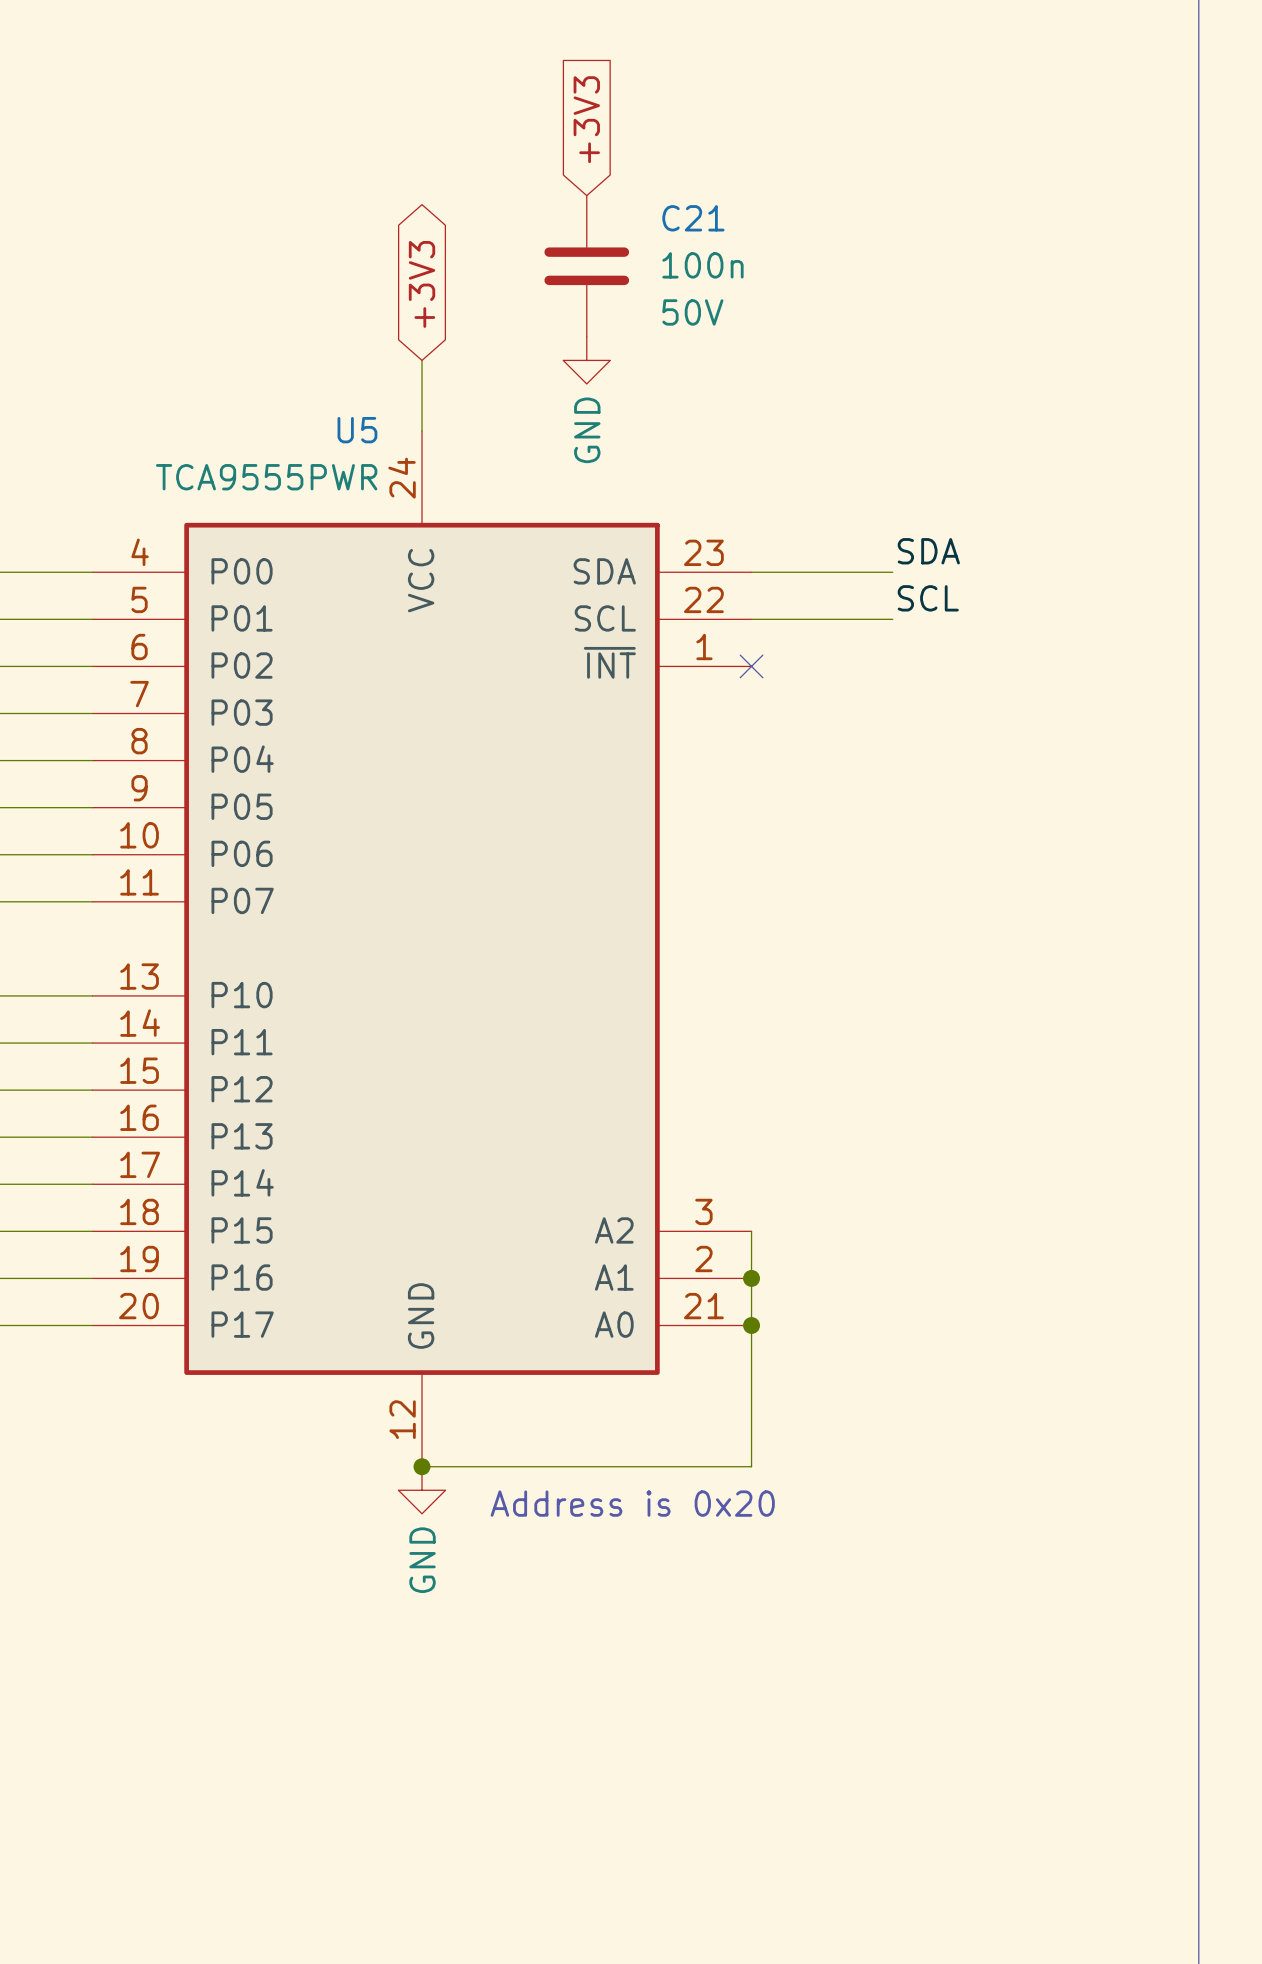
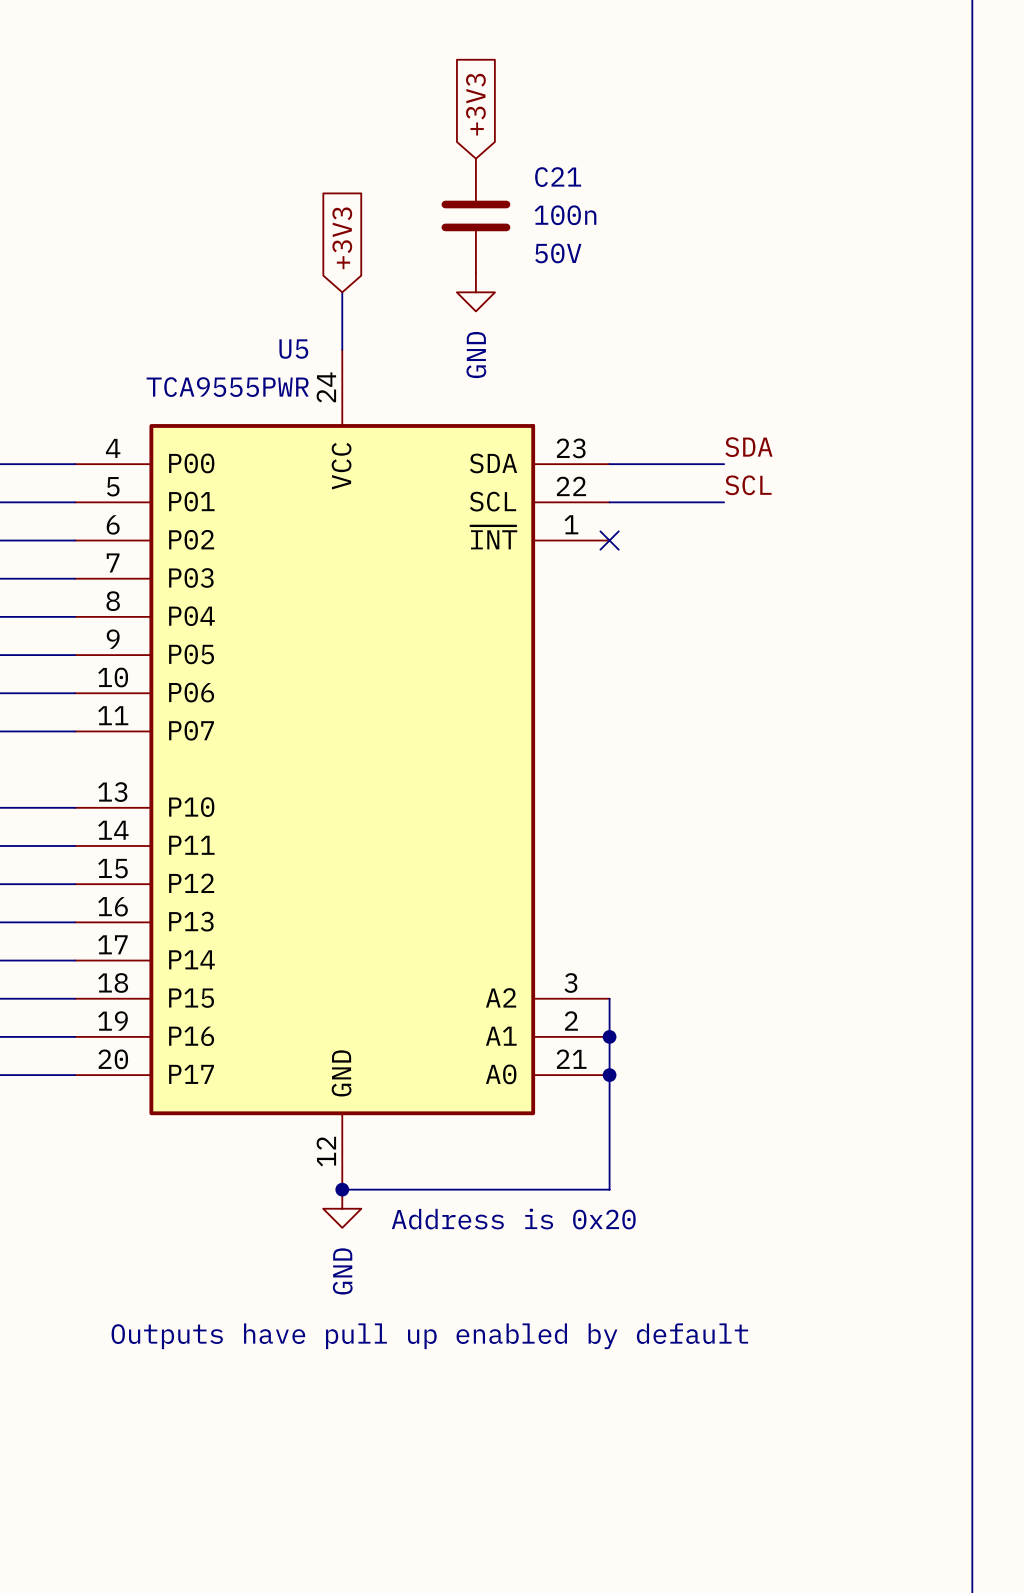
global label shape: bidirectional (422, 284) -> input (342, 238)
text: none -> Outputs have pull up enabled by default (429, 1336)

